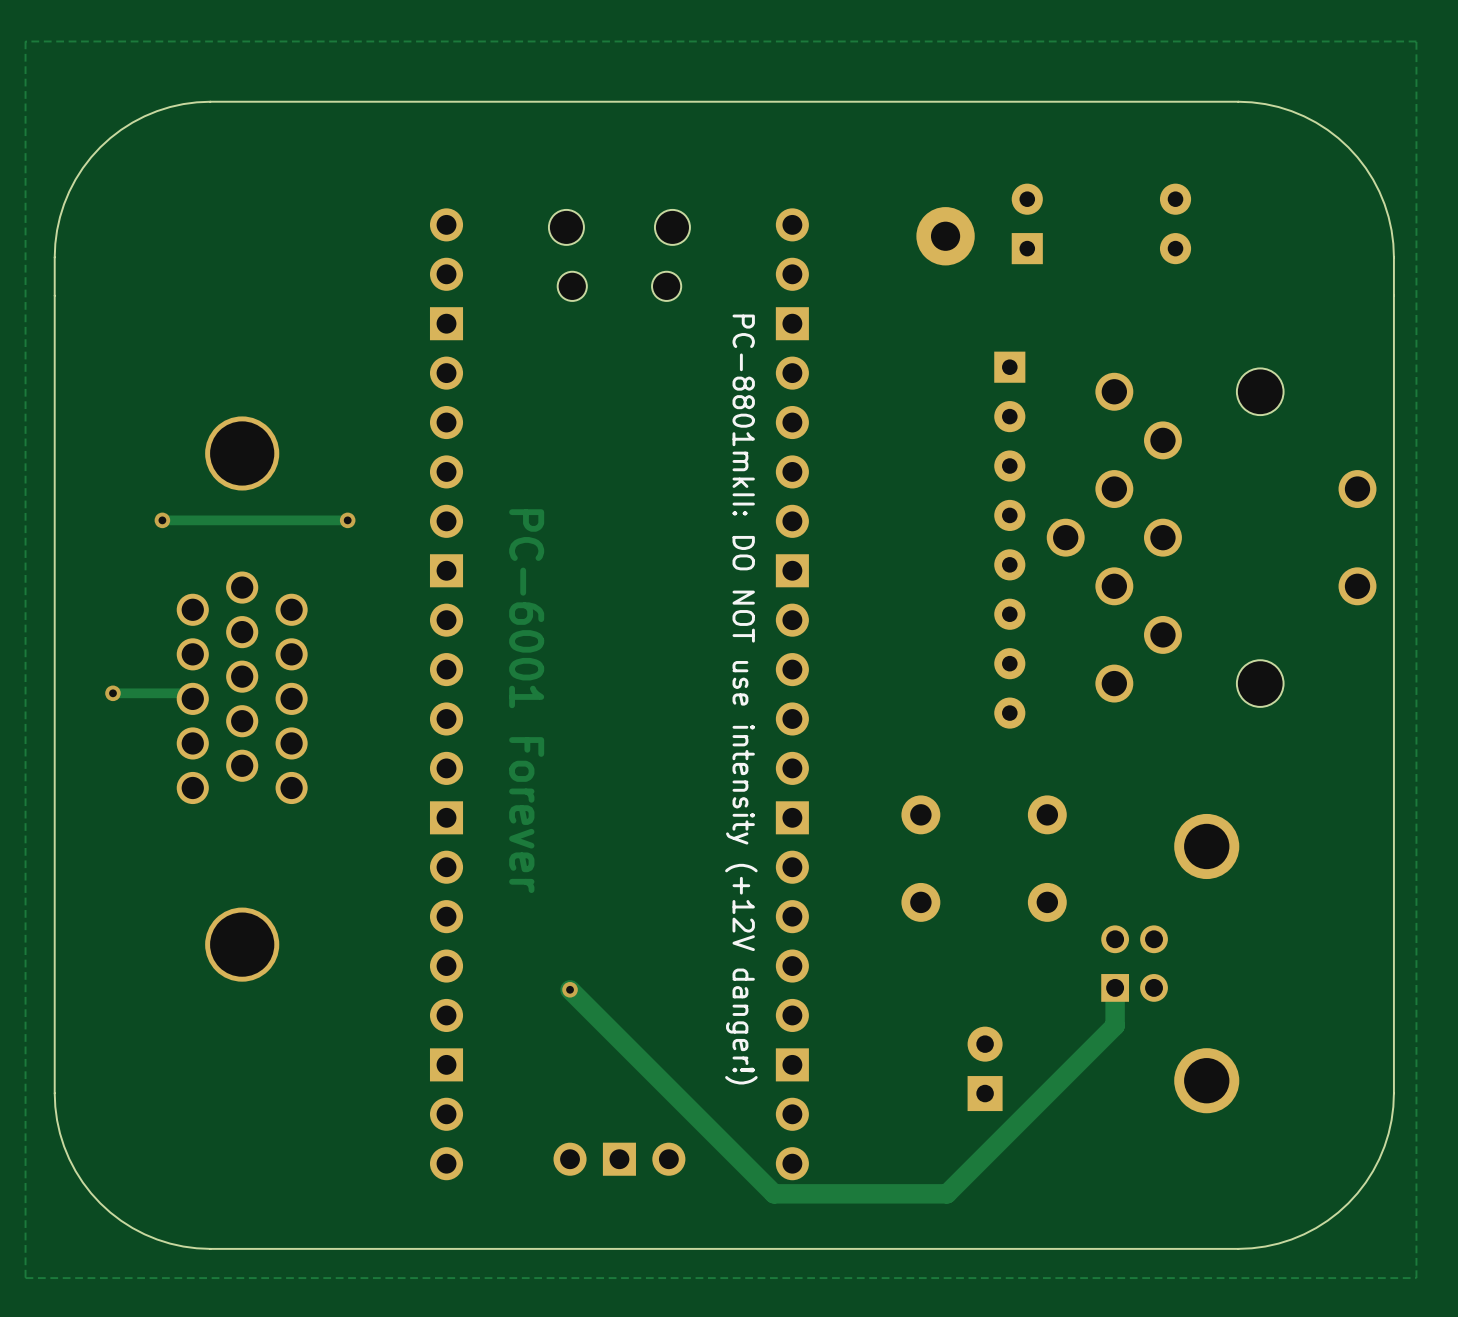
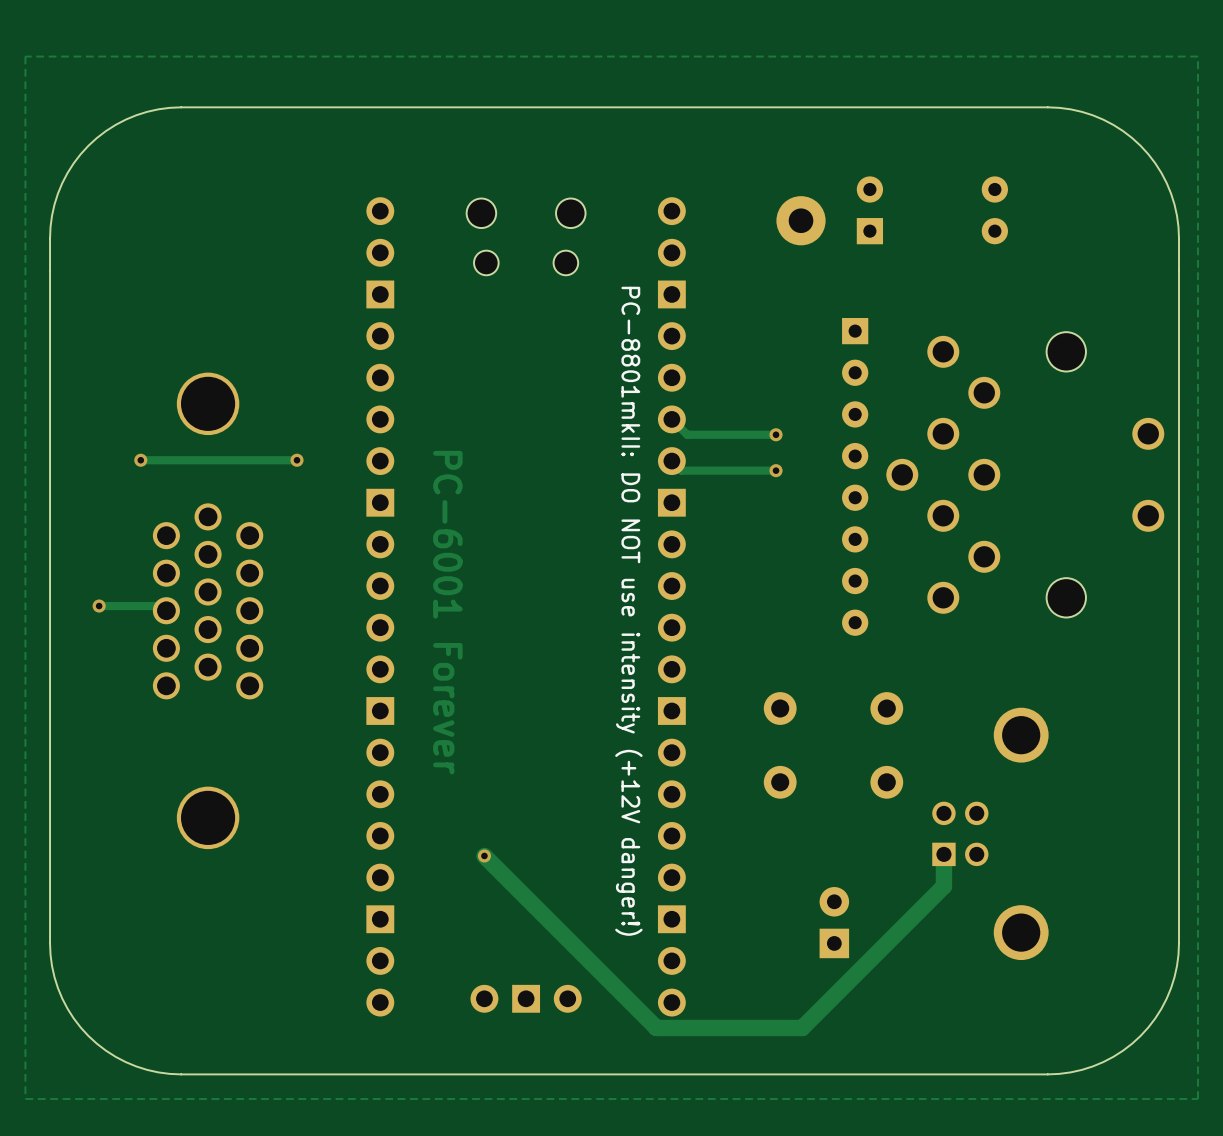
track: none -> (671, 419) (687, 434) (776, 434)
via: none -> (776, 434)
track: none -> (671, 461) (681, 470) (776, 470)
via: none -> (776, 470)

